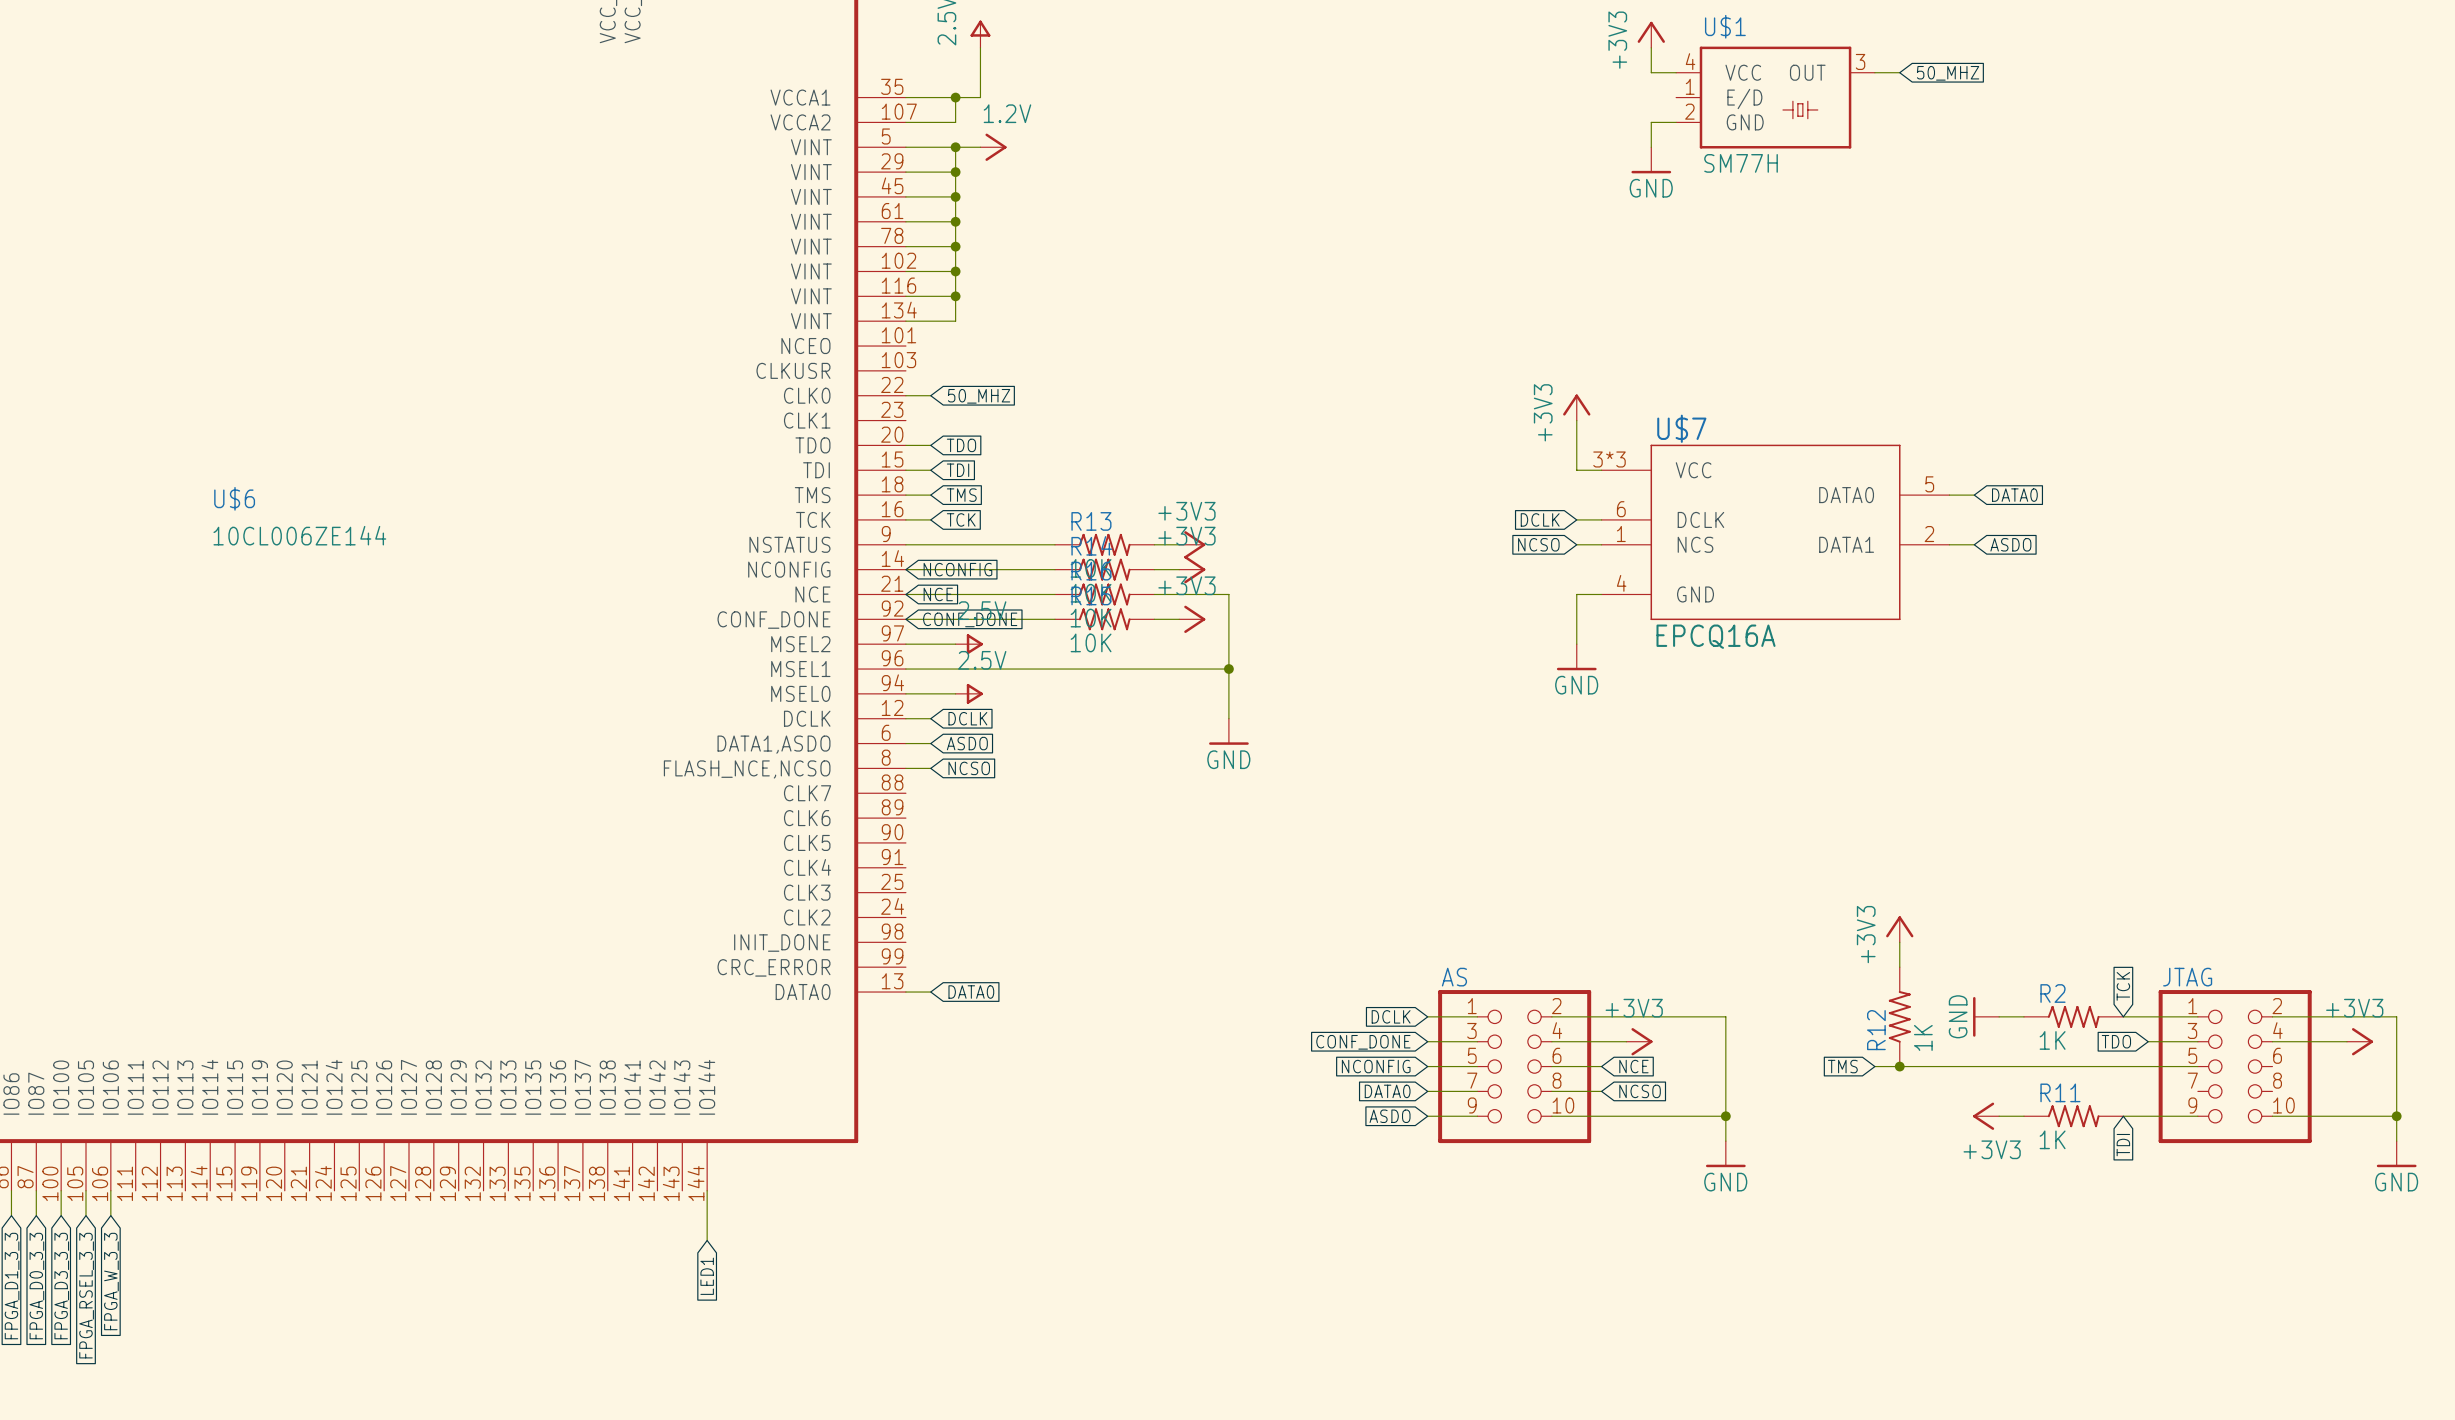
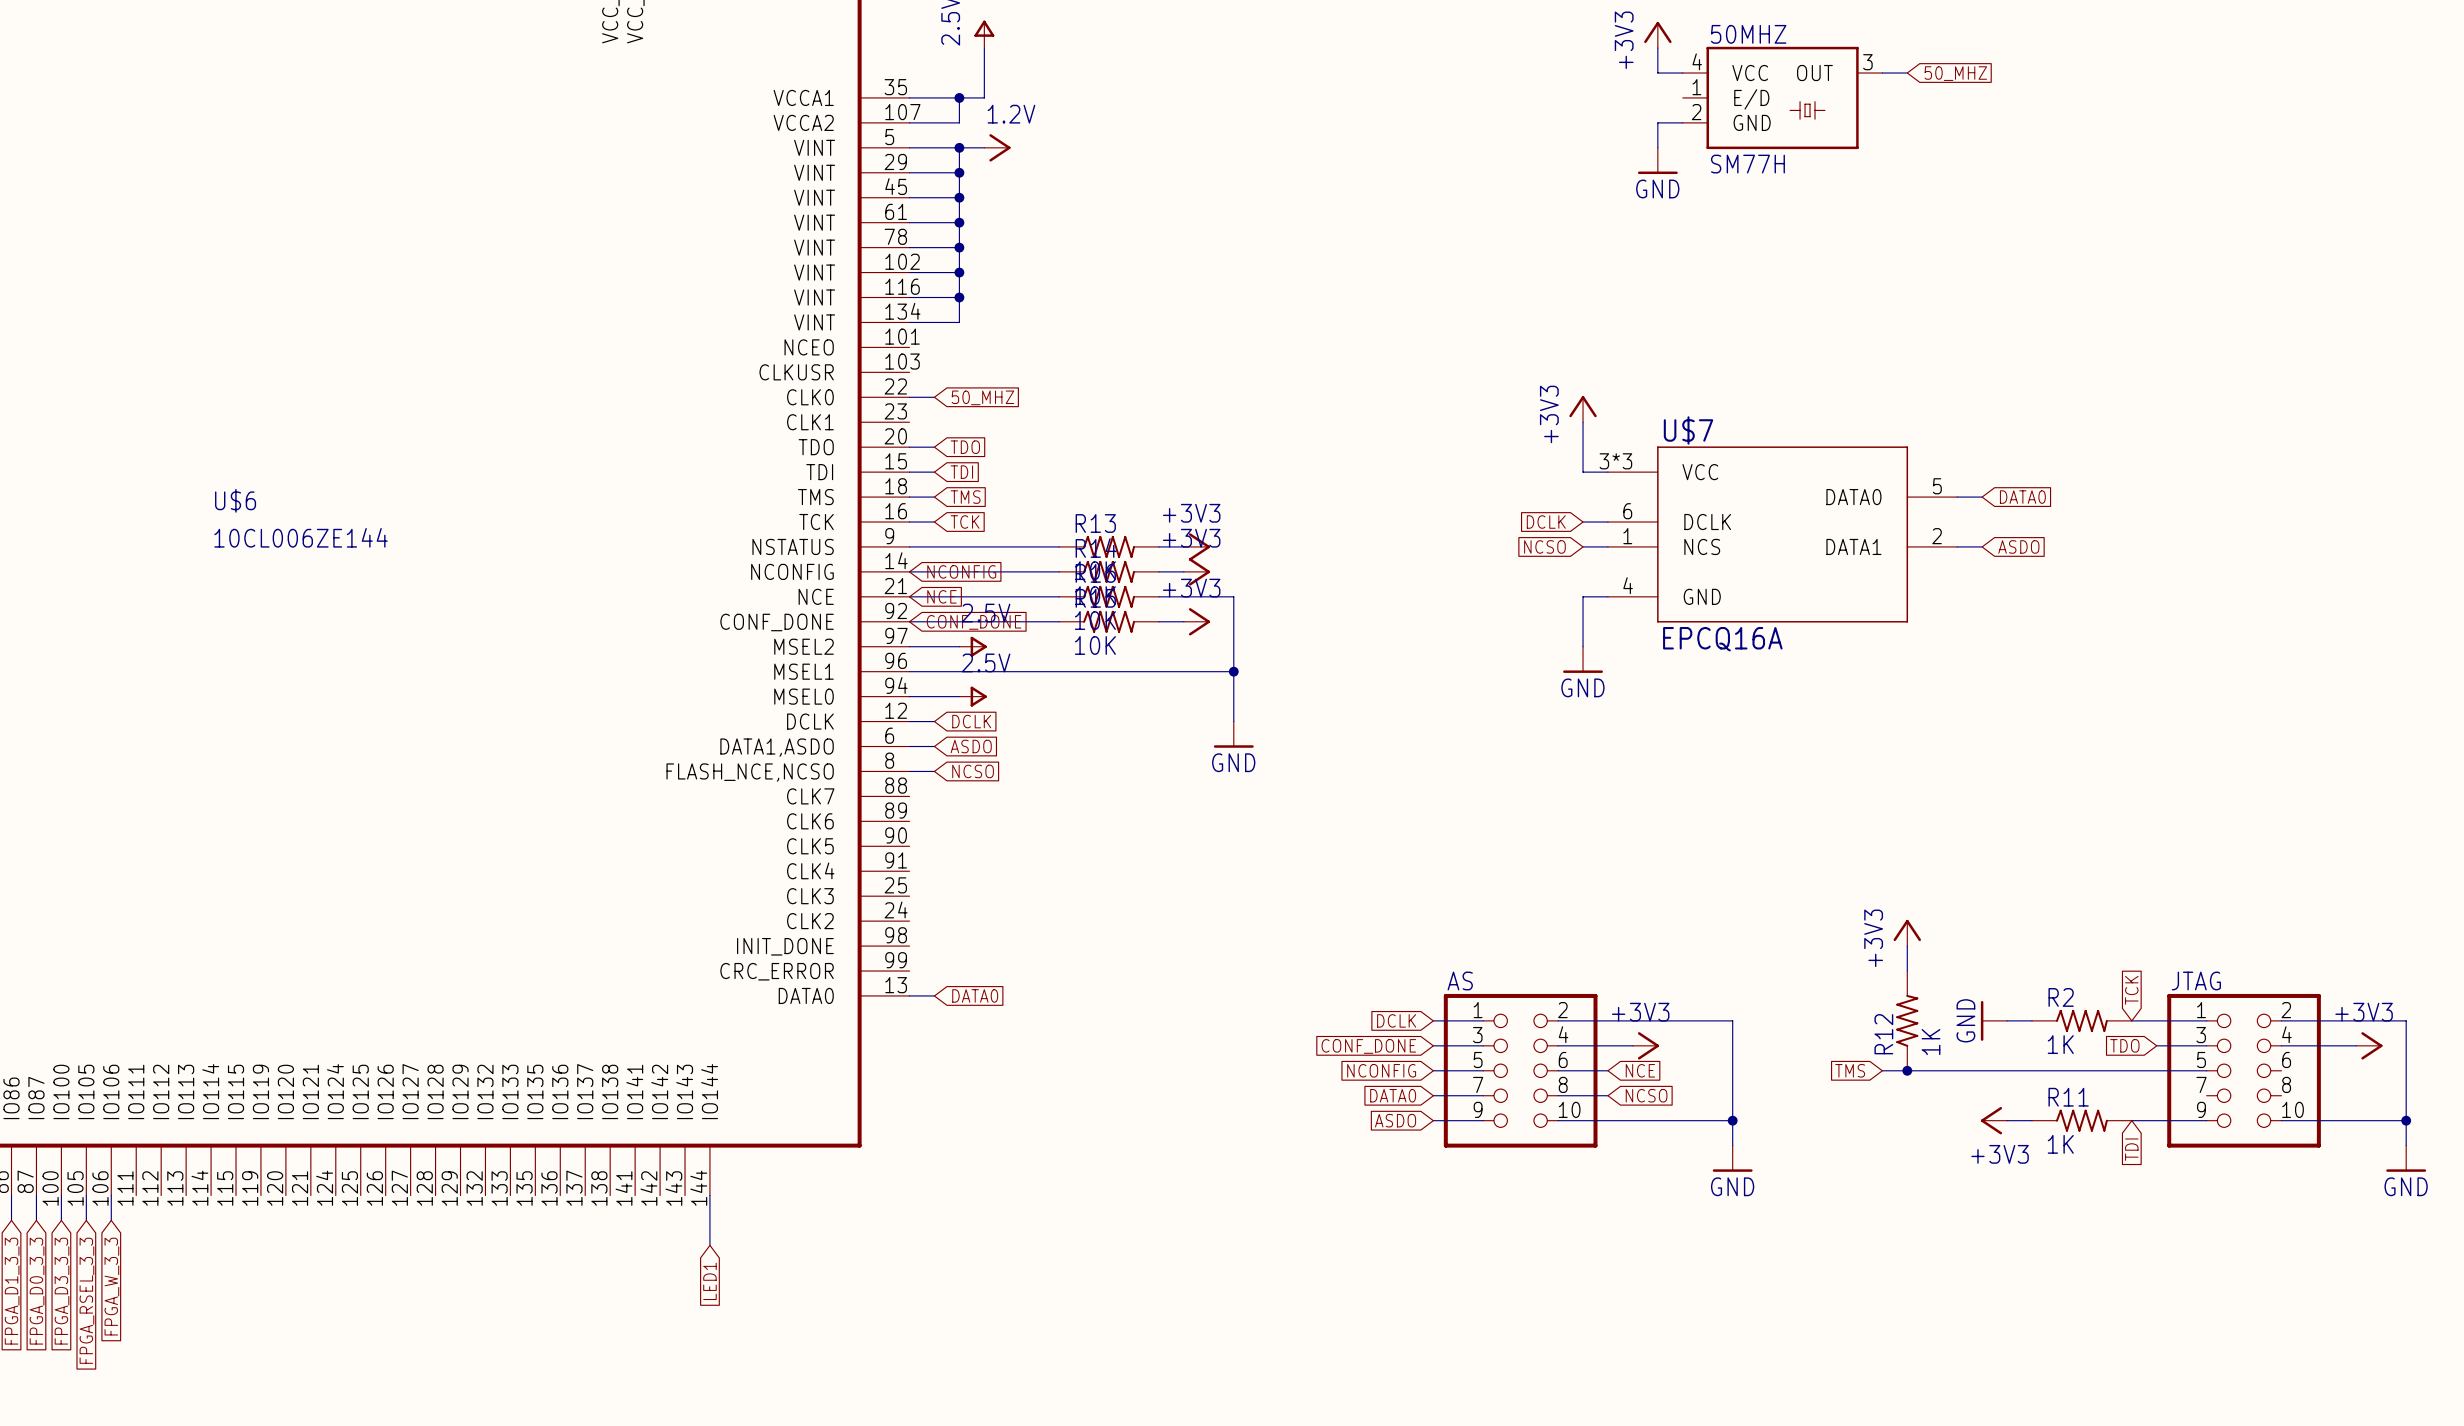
U$1 name: U$1 (1725, 26) -> 50MHZ (1748, 34)

